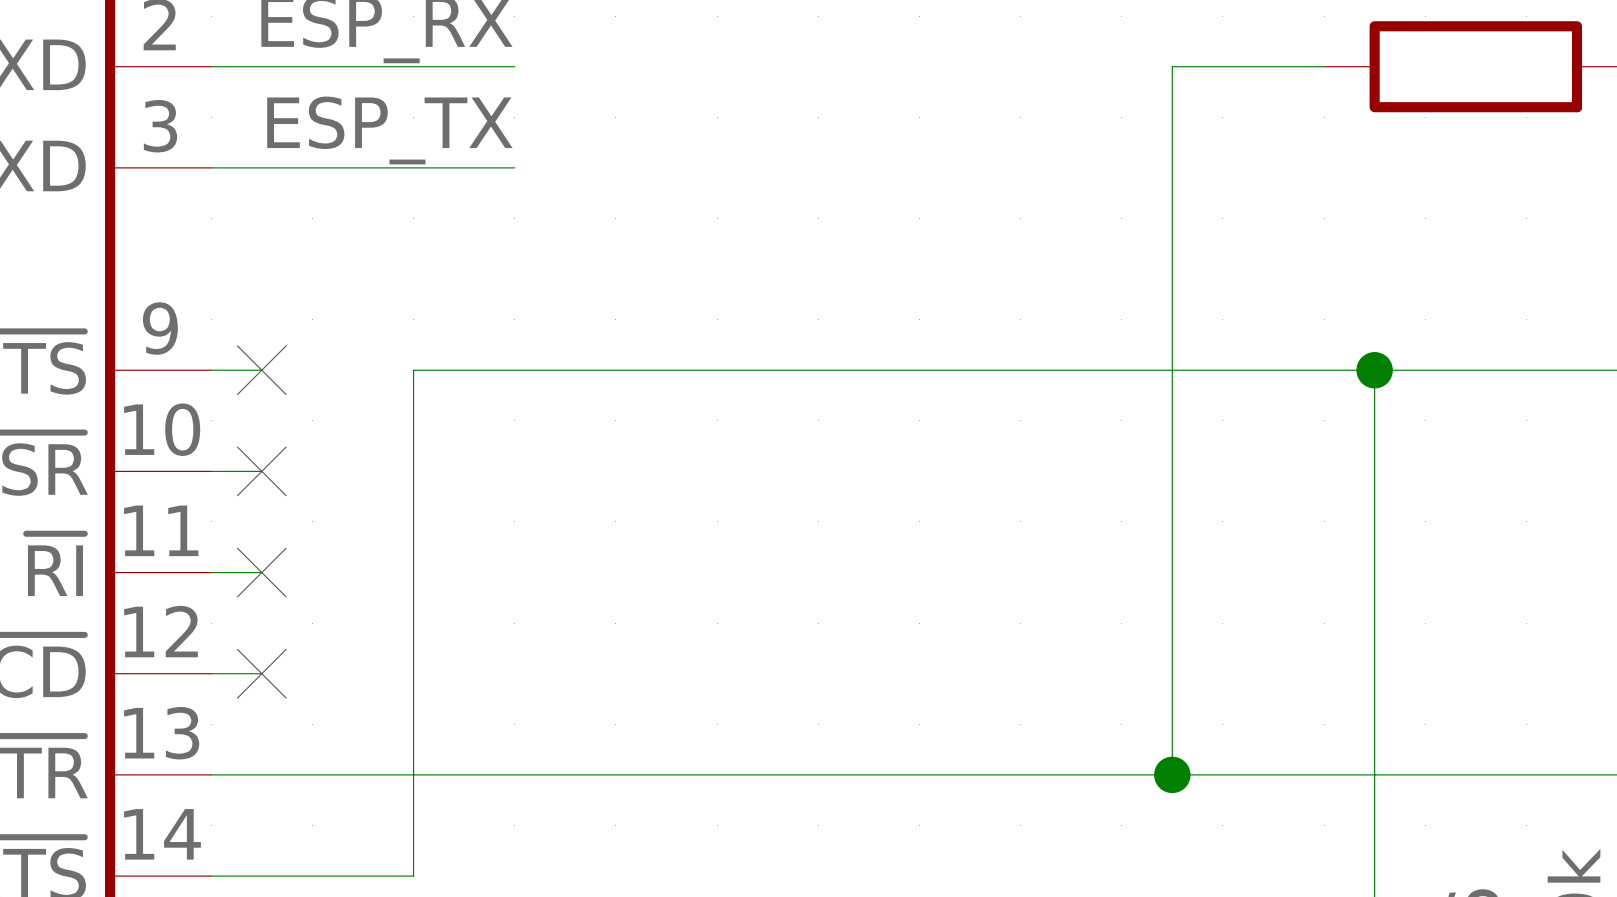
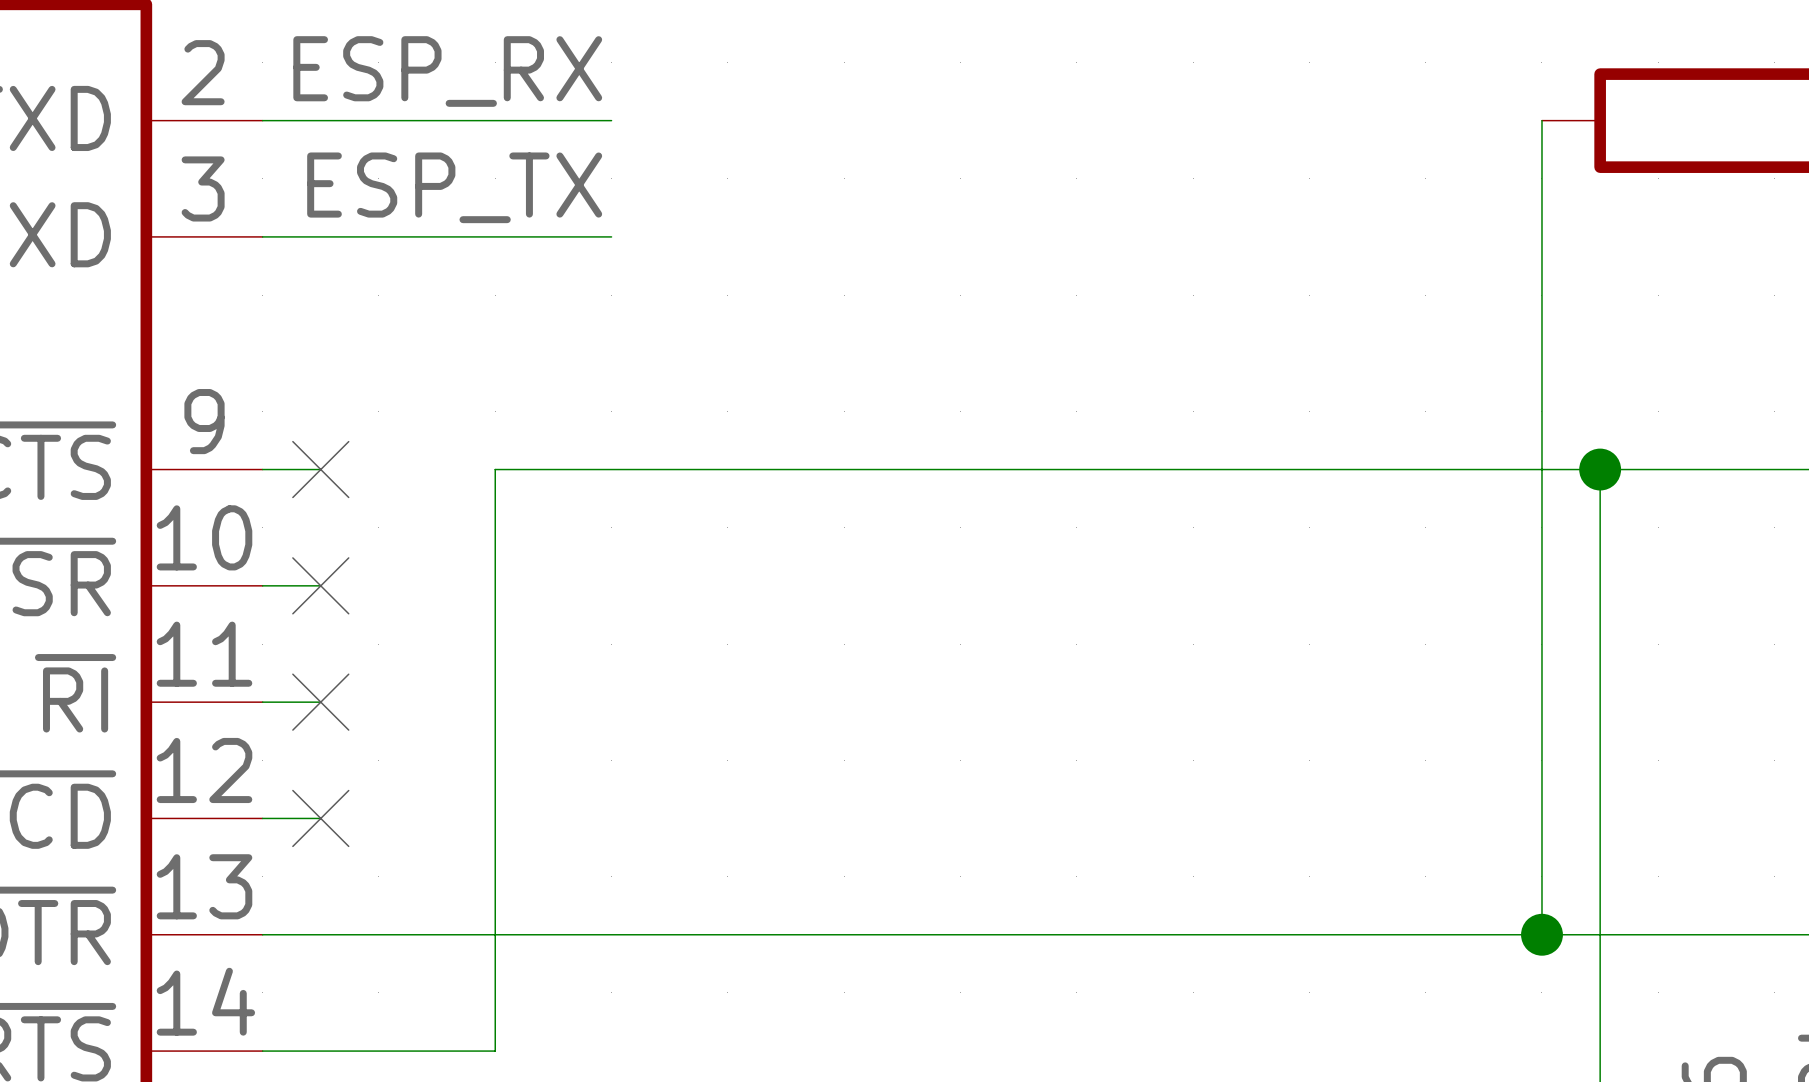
wire: (1324, 66) (1172, 66) (1172, 774) -> (1541, 120) (1541, 934)
junction position: (1172, 774) -> (1541, 934)

